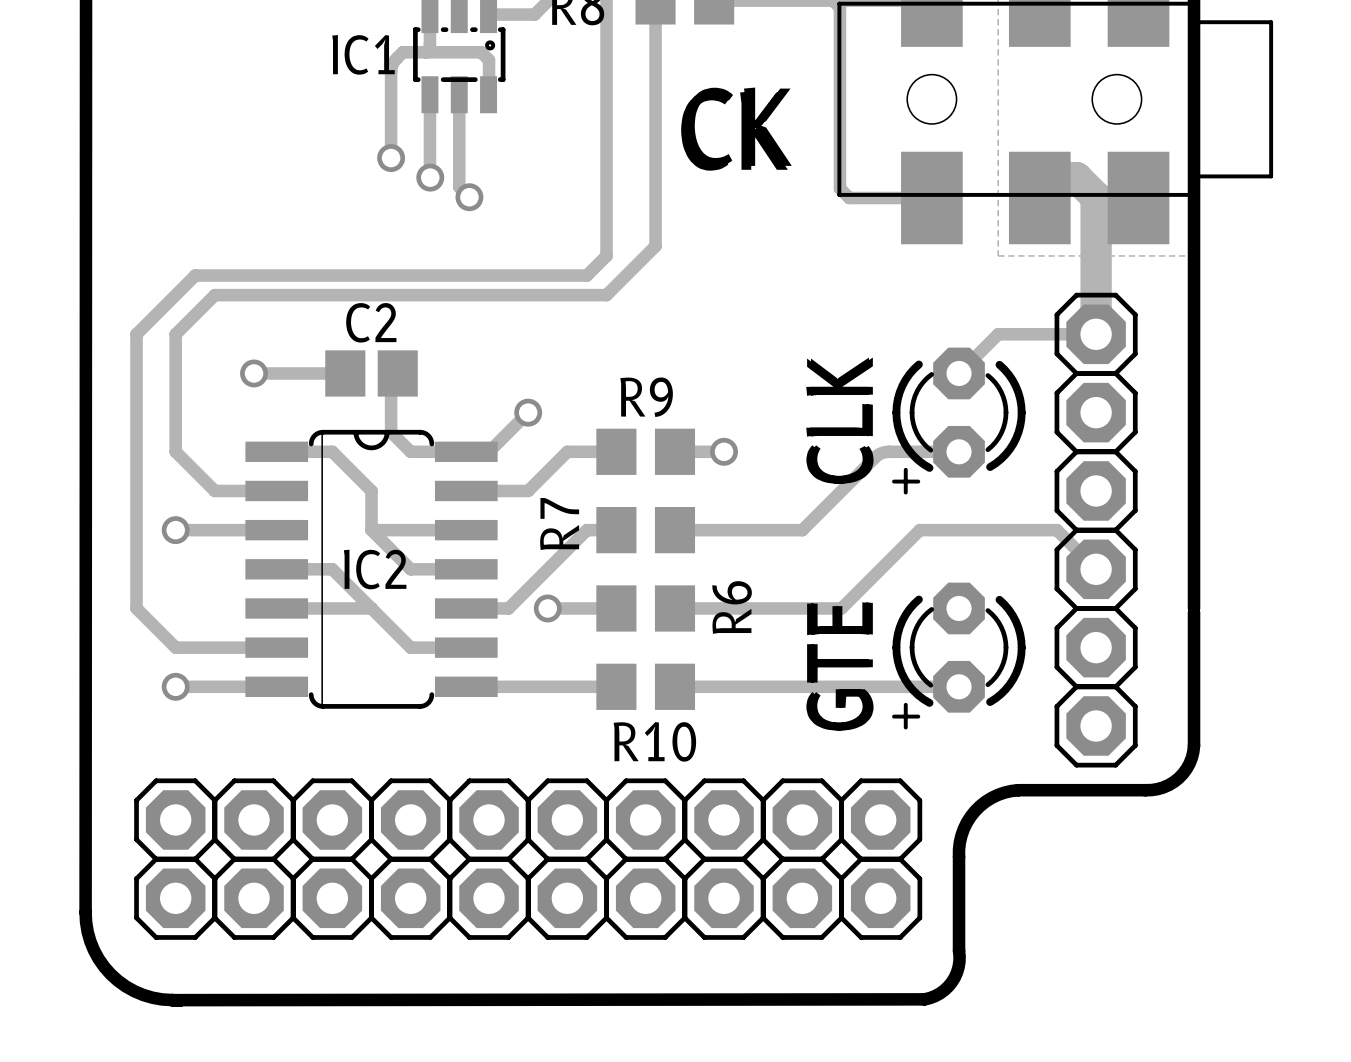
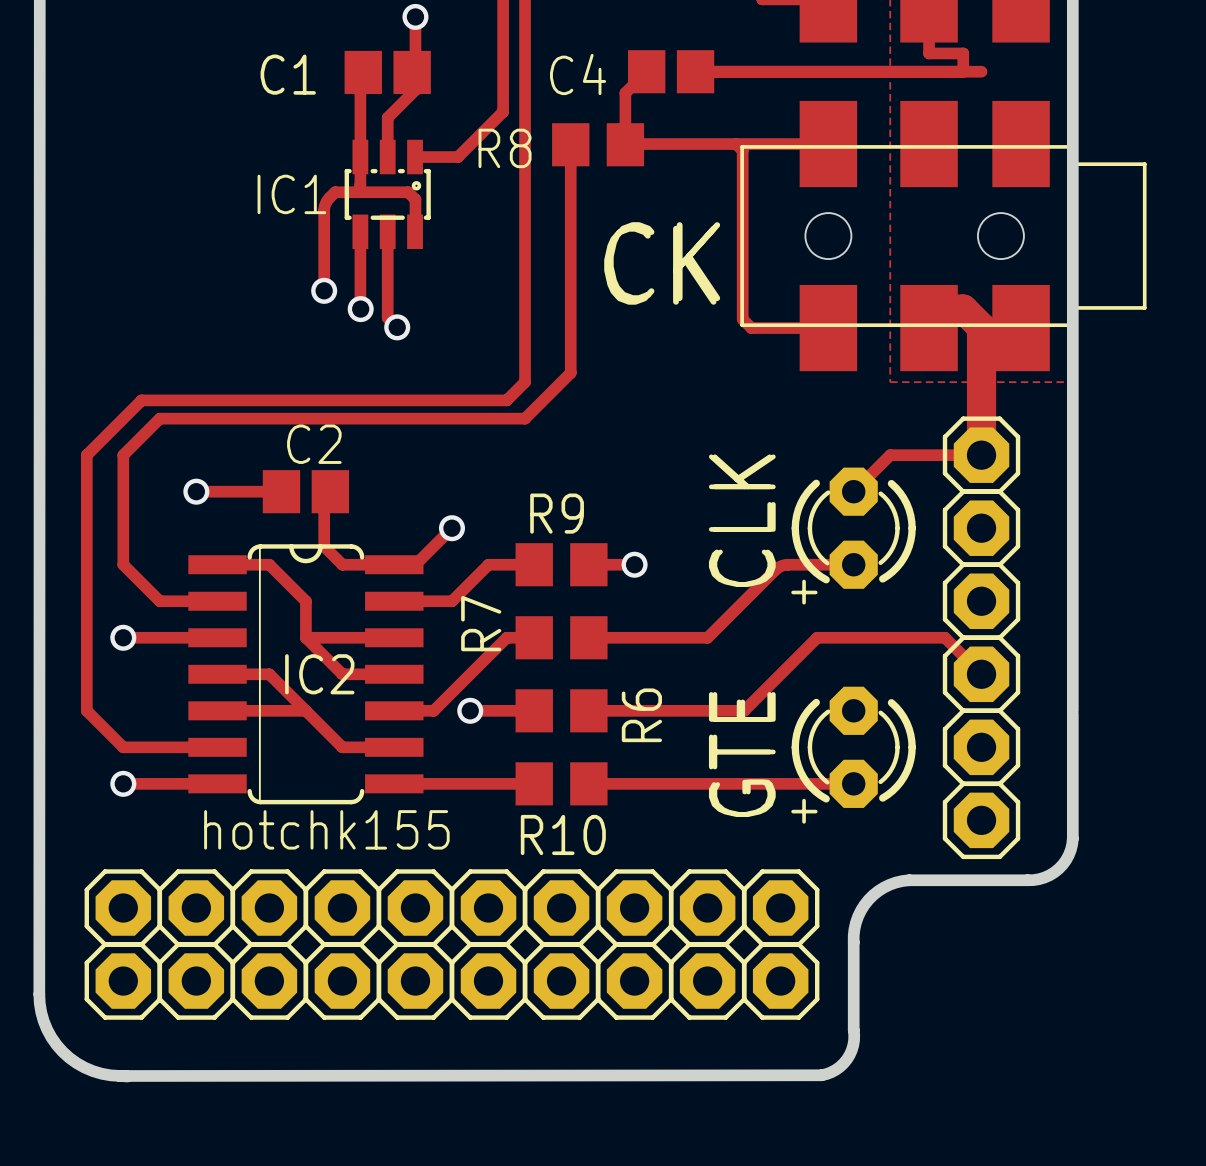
text: none -> hotchk155 (326, 829)

